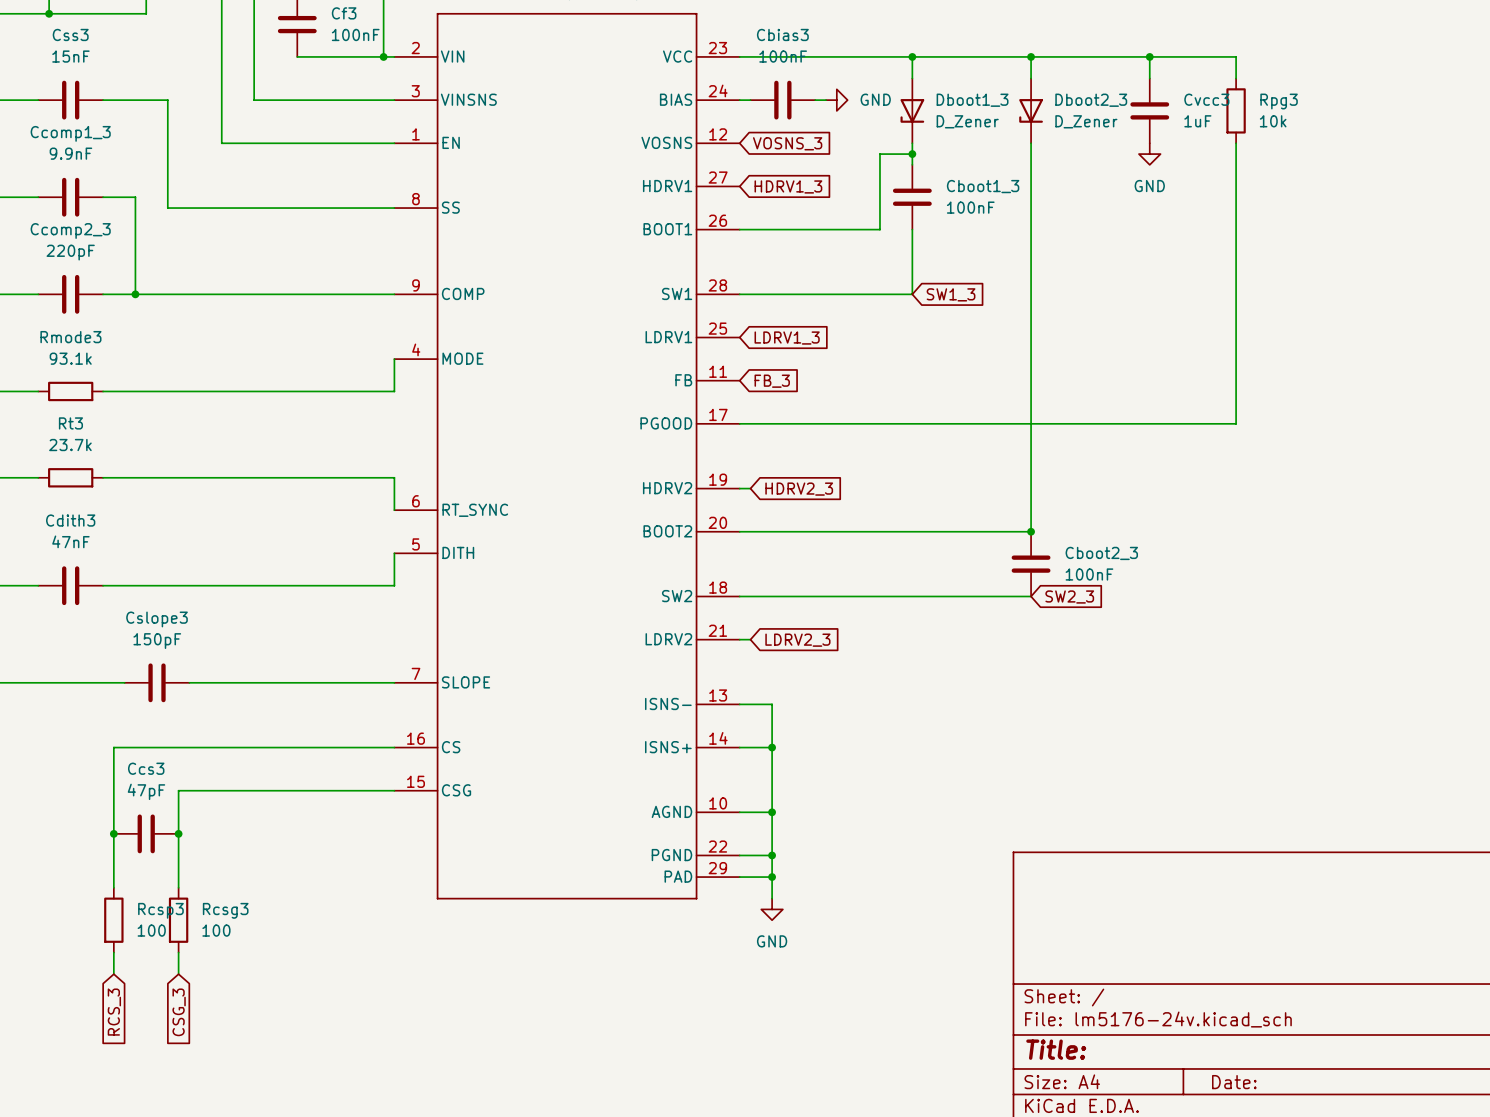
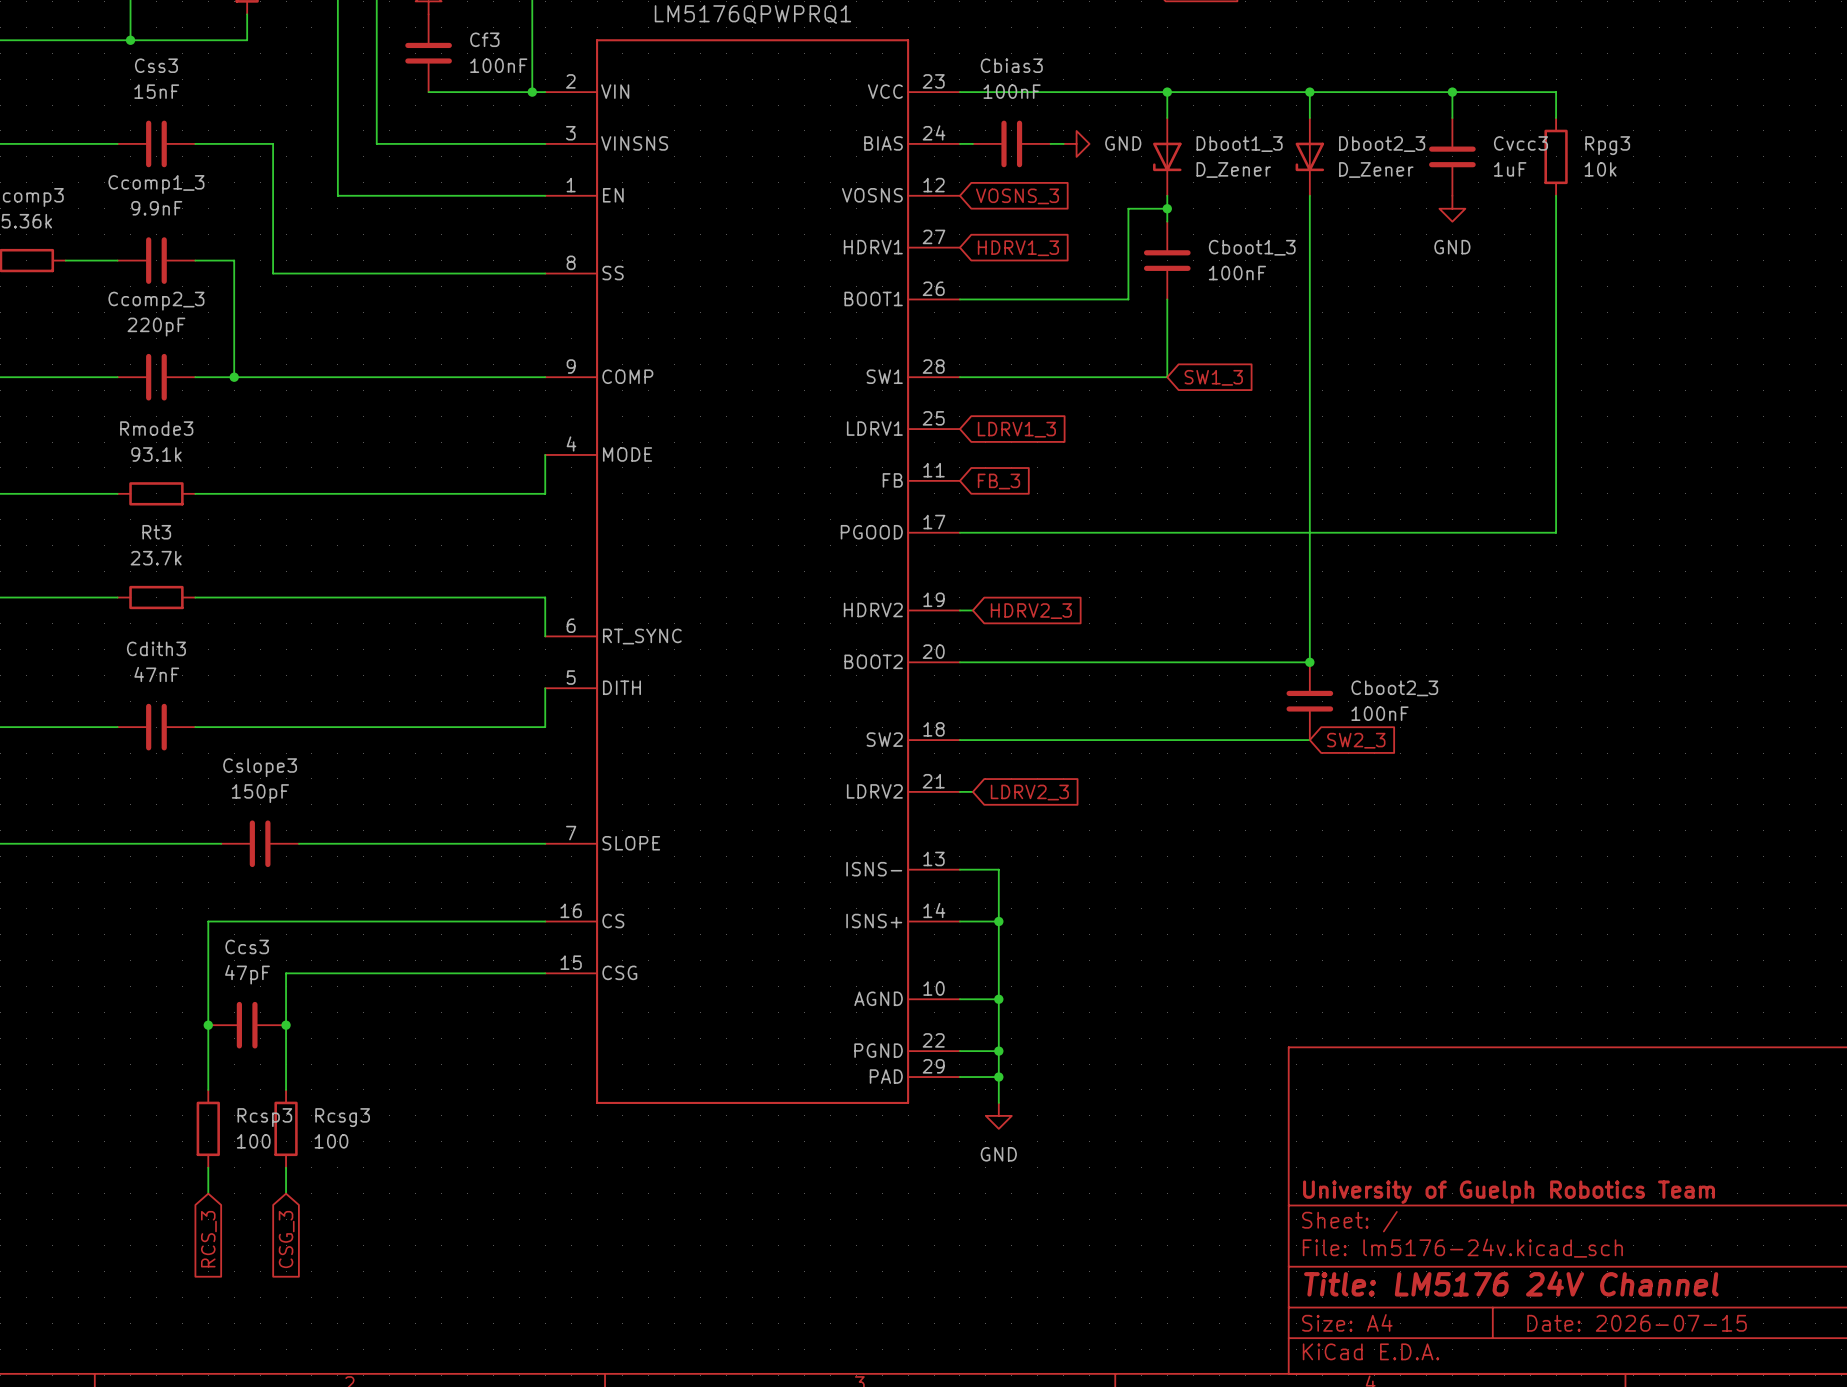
title block: none -> University of Guelph Robotics Team (1509, 1192)
title block: Title: (1056, 1049) -> Title: LM5176 24V Channel (1511, 1283)
title block: Date: (1234, 1082) -> Date: 2026-07-15 (1637, 1323)

